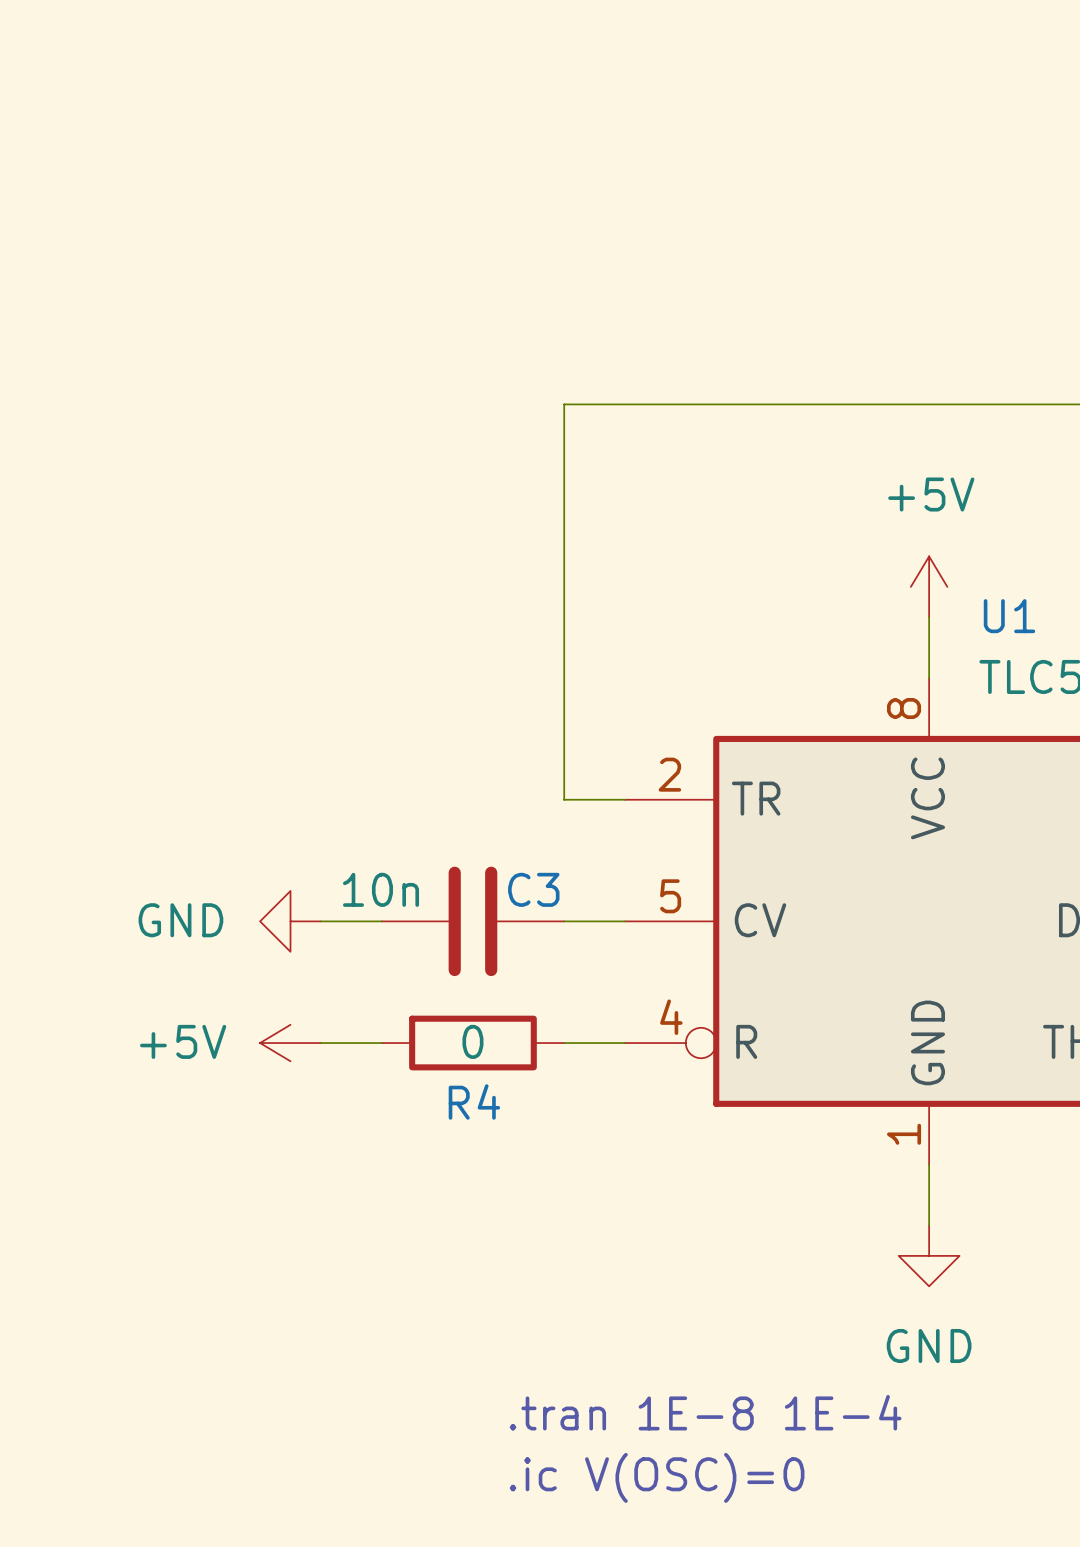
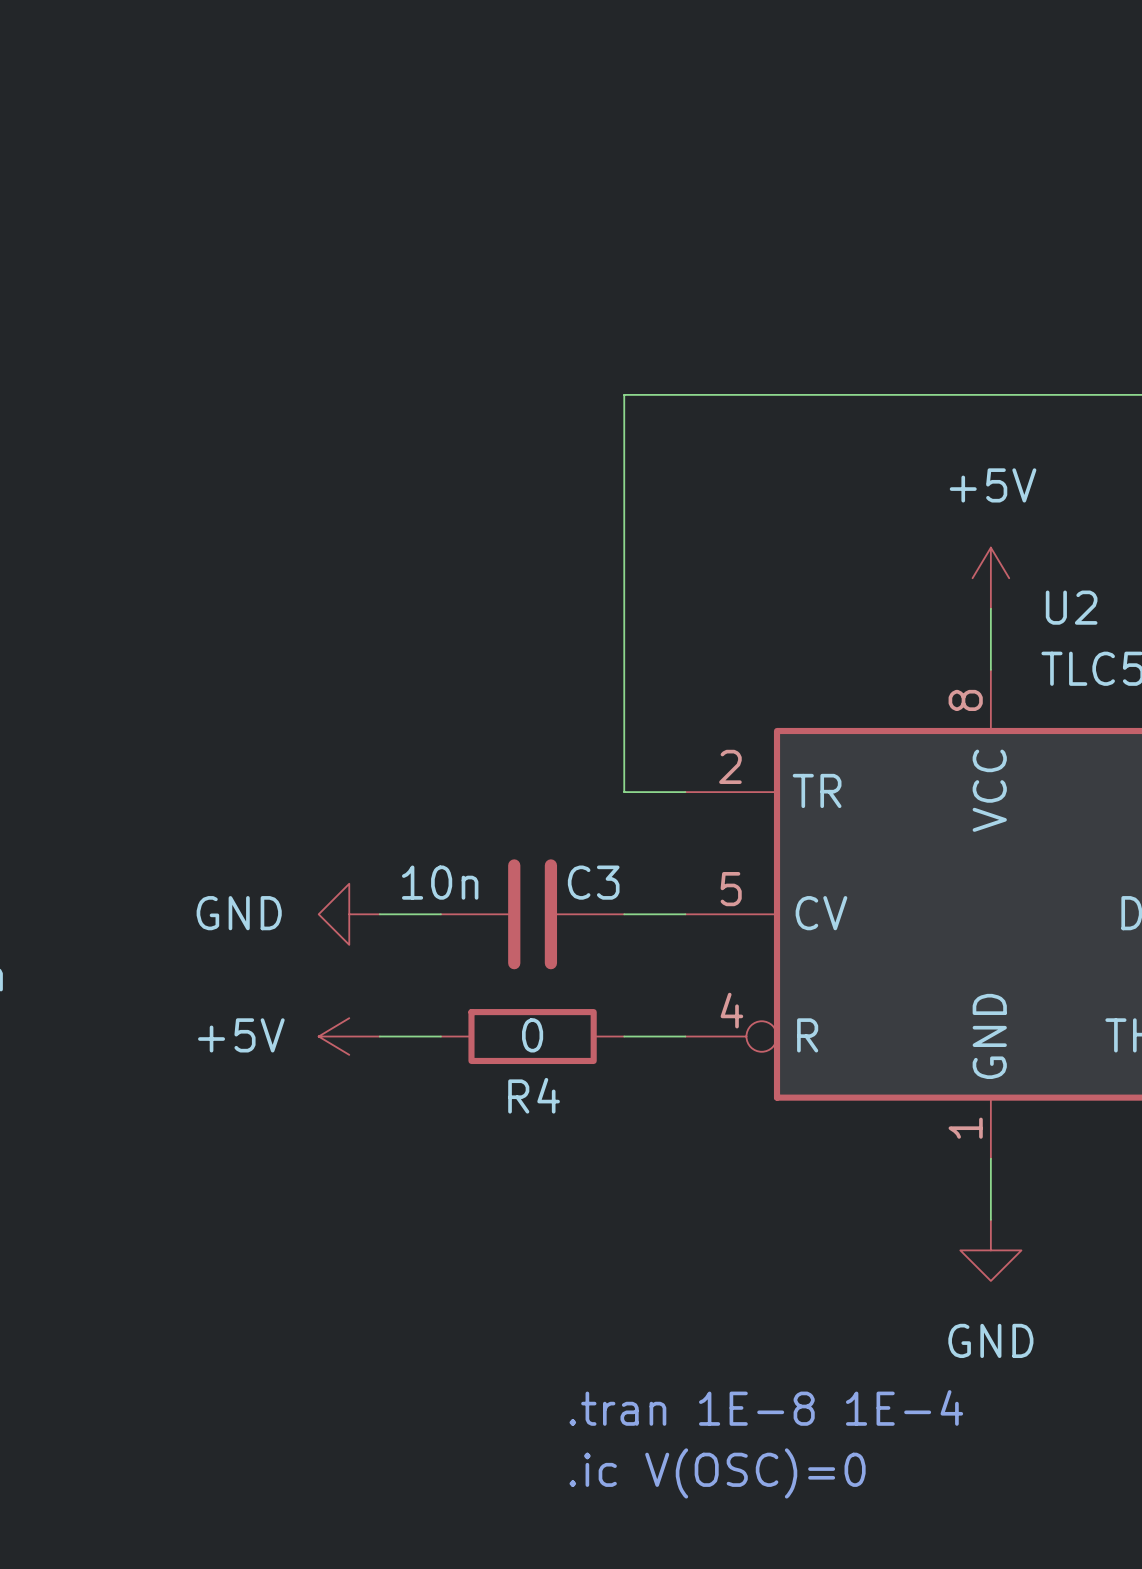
U1 name: U1 (1009, 616) -> U2 (1071, 607)

